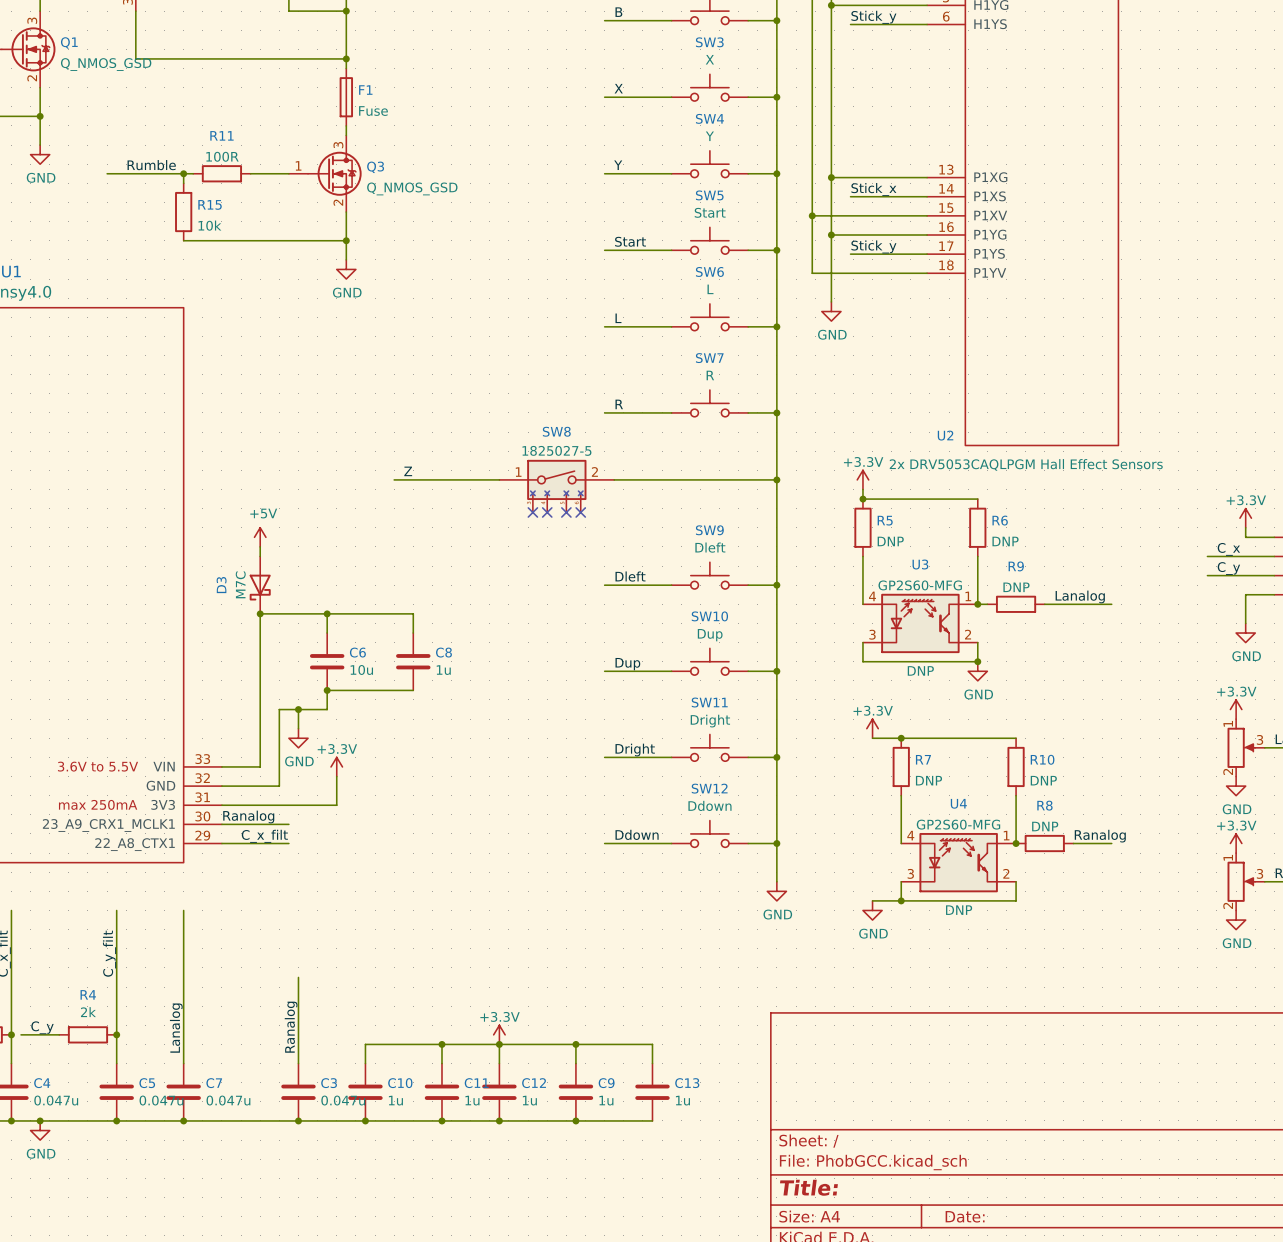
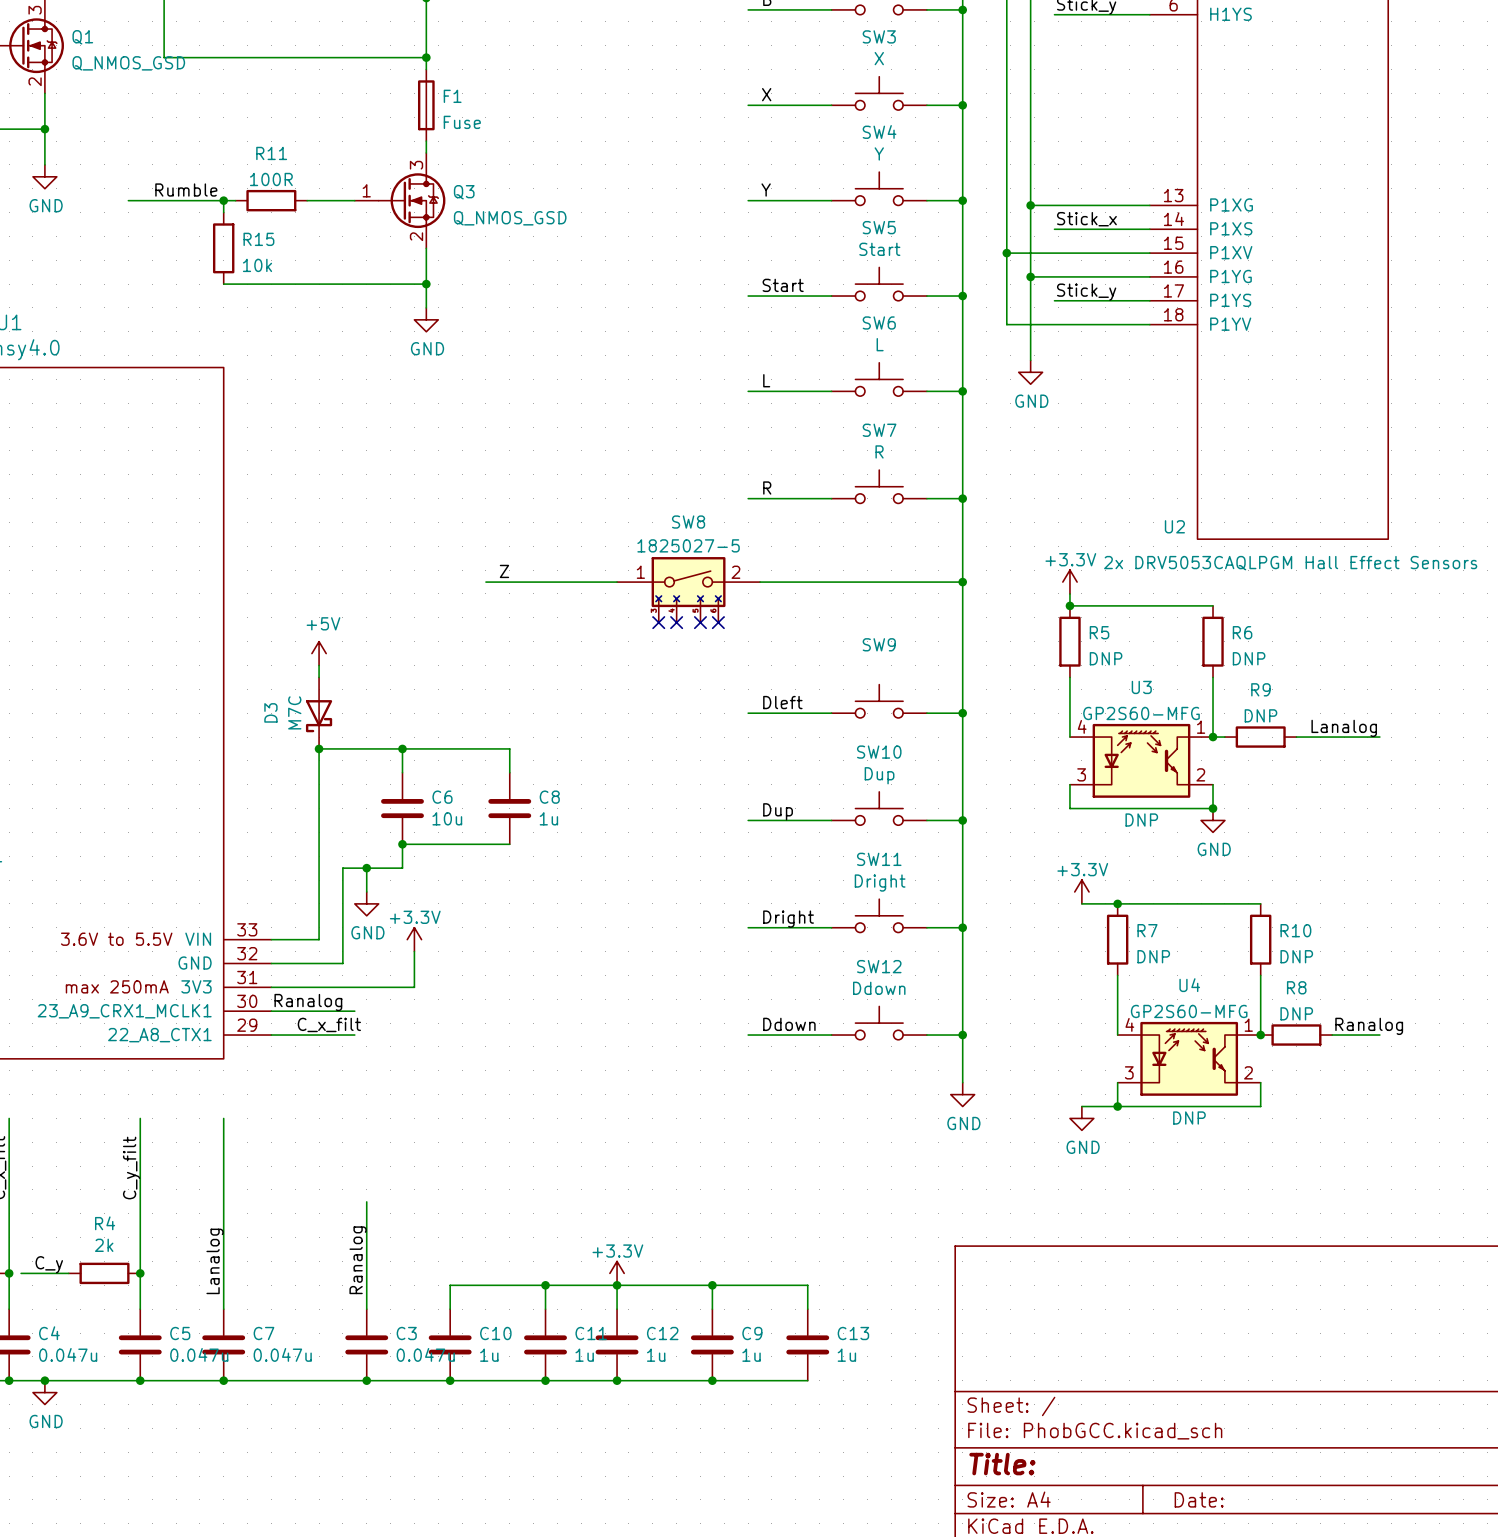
SW9 value: Dleft (710, 547) -> none

